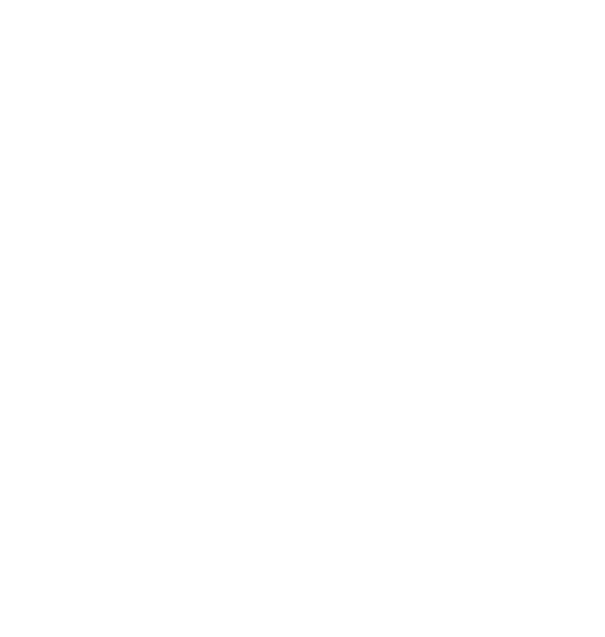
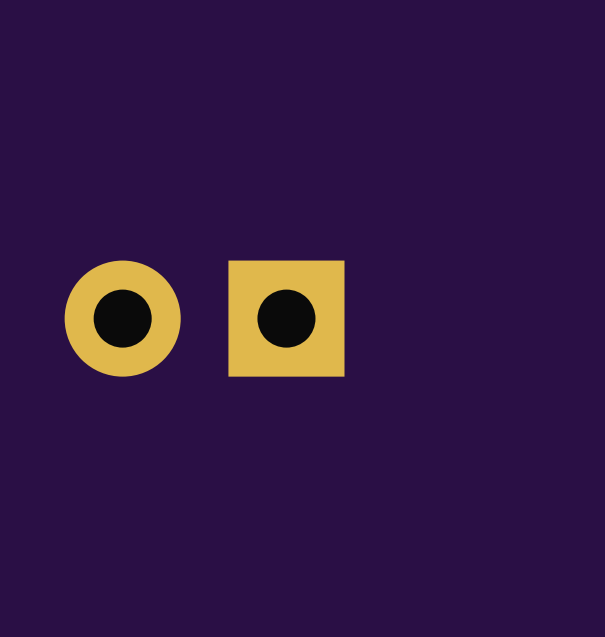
part: none -> (204, 318)

